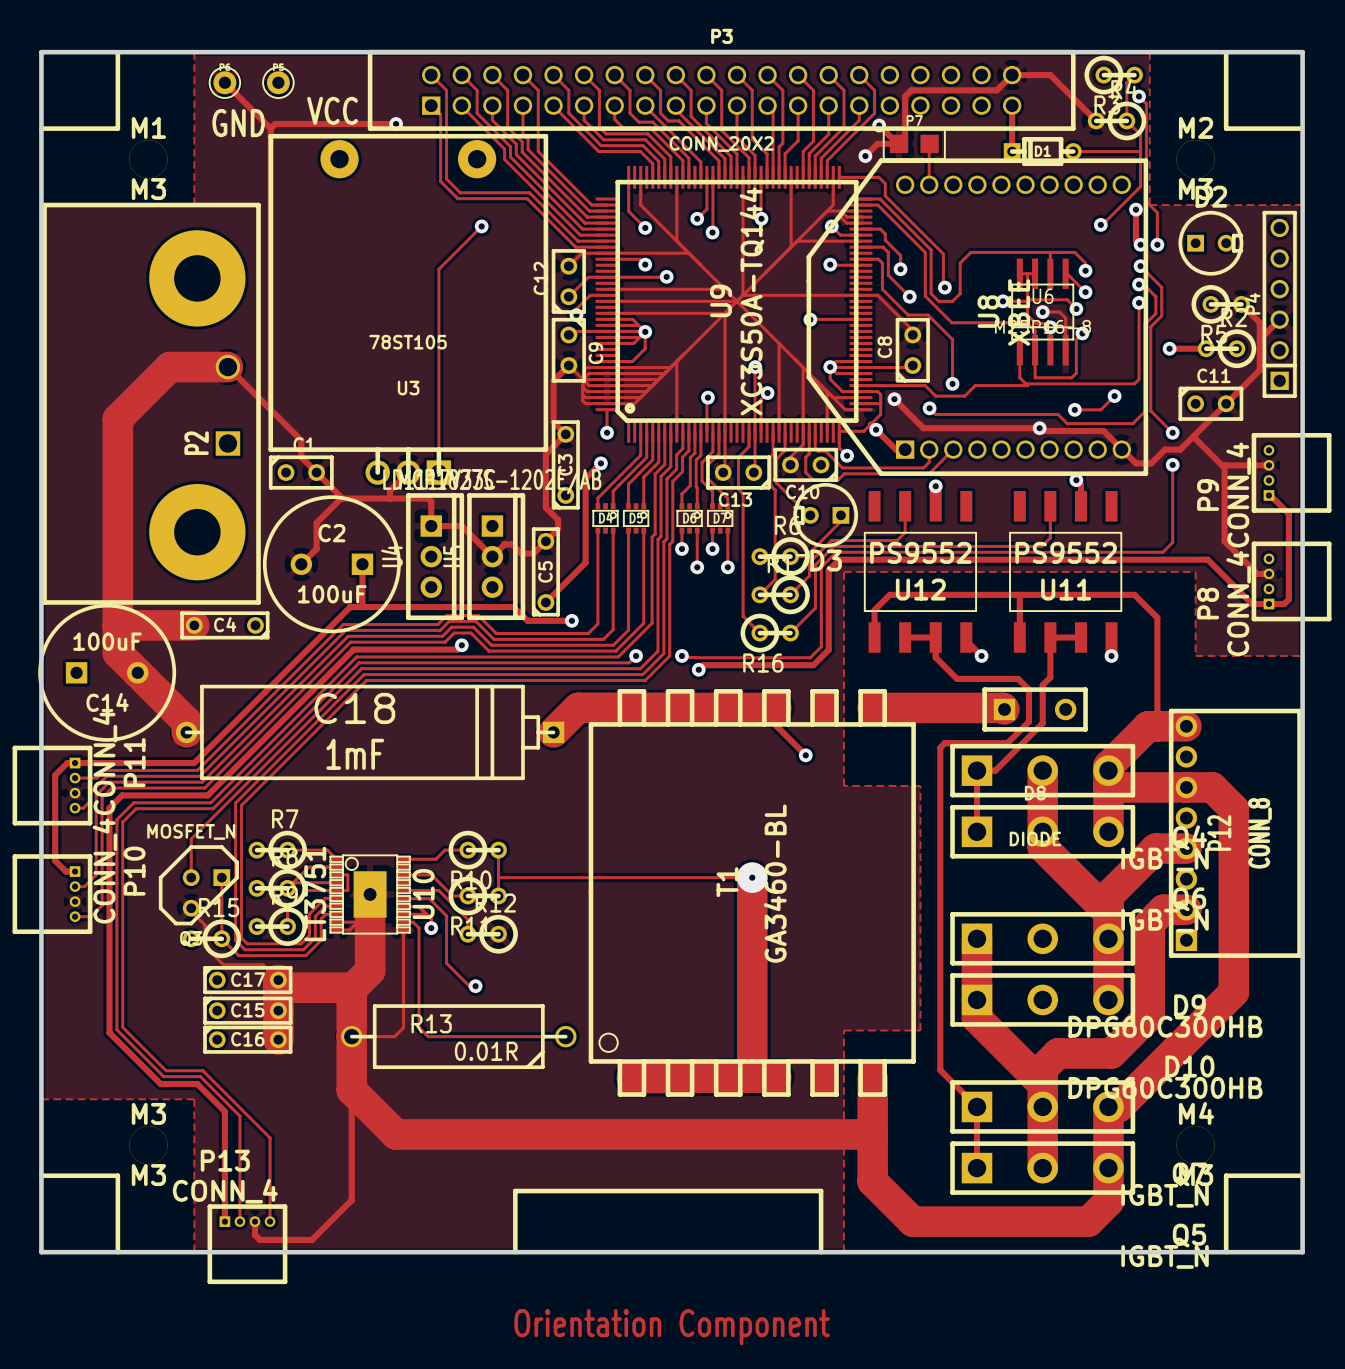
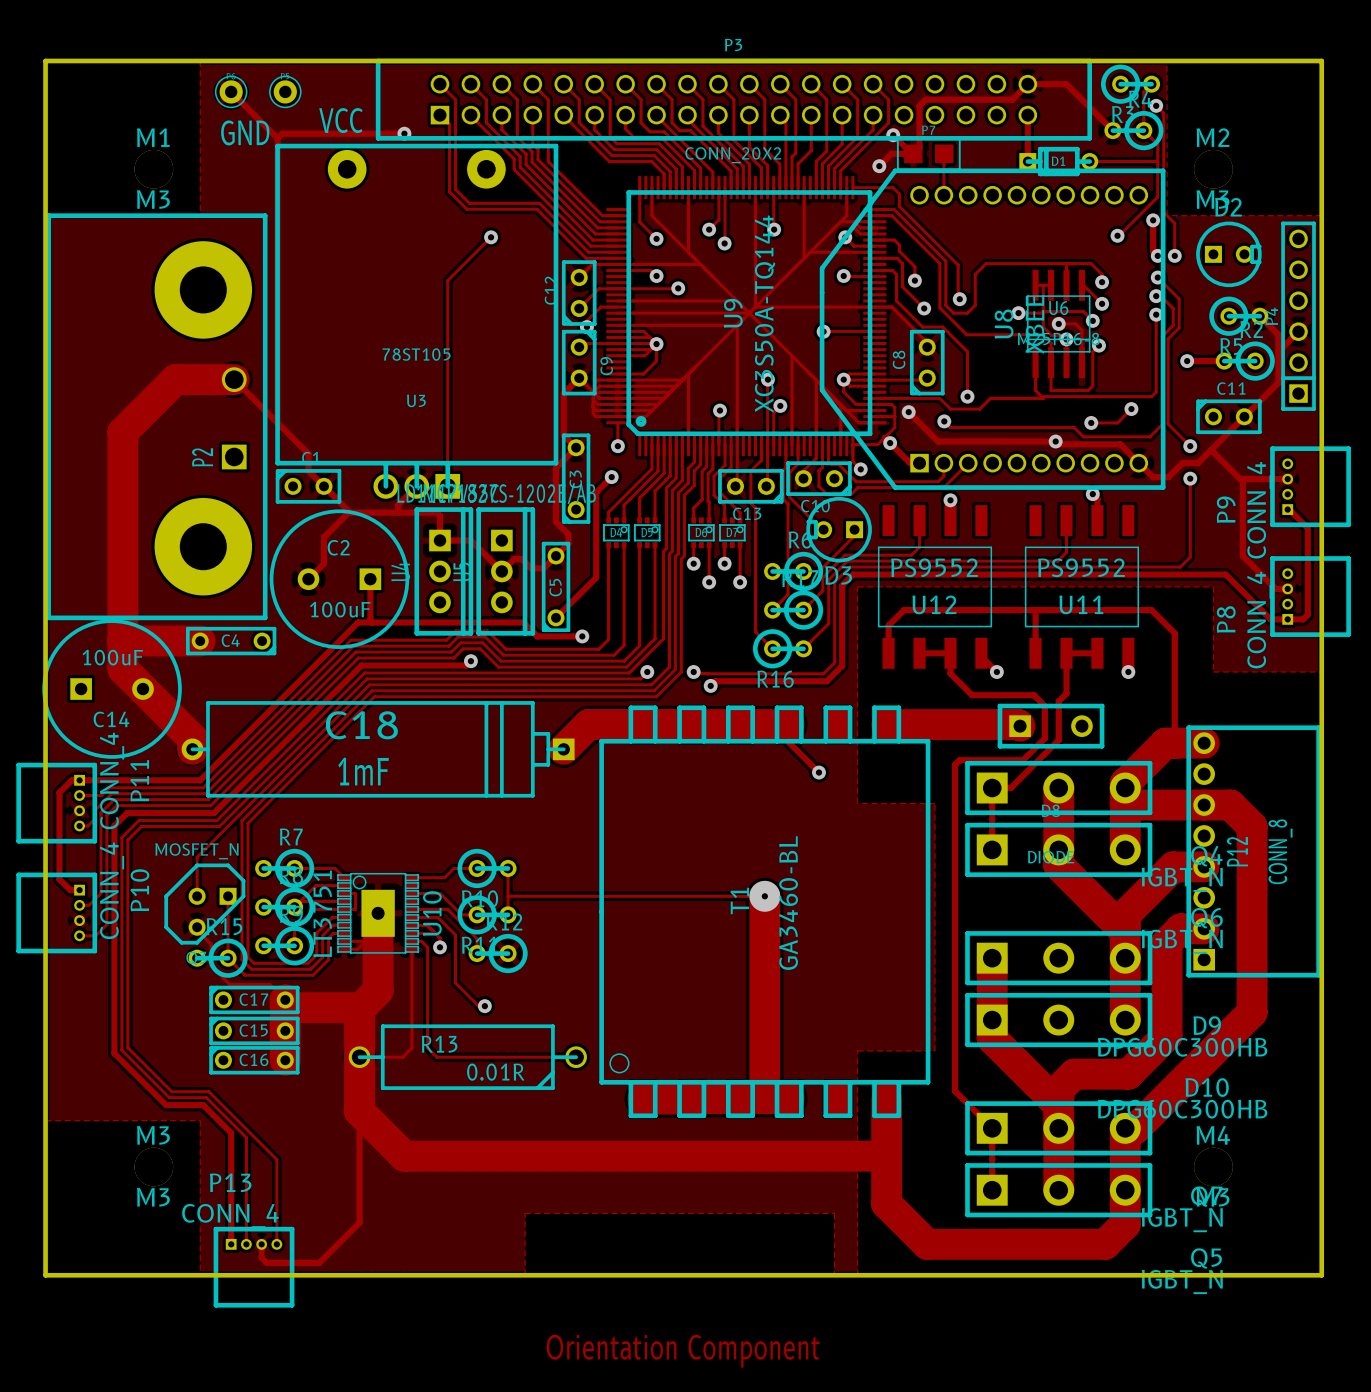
line: (117, 52) (117, 128) (41, 128) -> none
line: (1226, 52) (1226, 128) (1302, 128) -> none
line: (41, 1175) (117, 1175) (117, 1252) -> none
line: (1302, 1175) (1226, 1175) (1226, 1252) -> none
line: (515, 1252) (515, 1191) (821, 1191) (821, 1252) -> none

